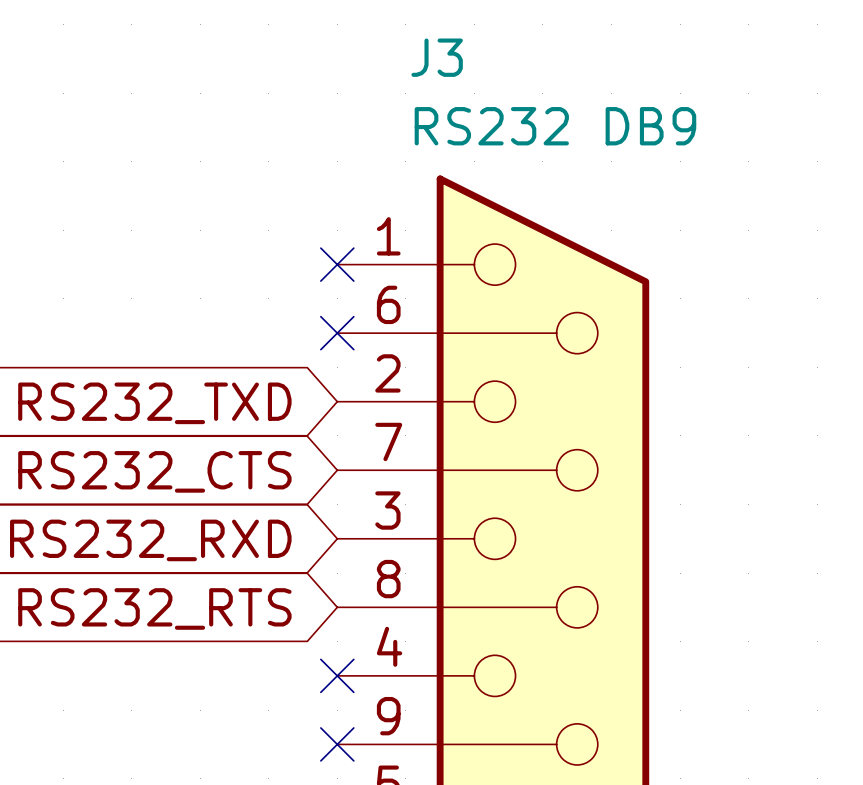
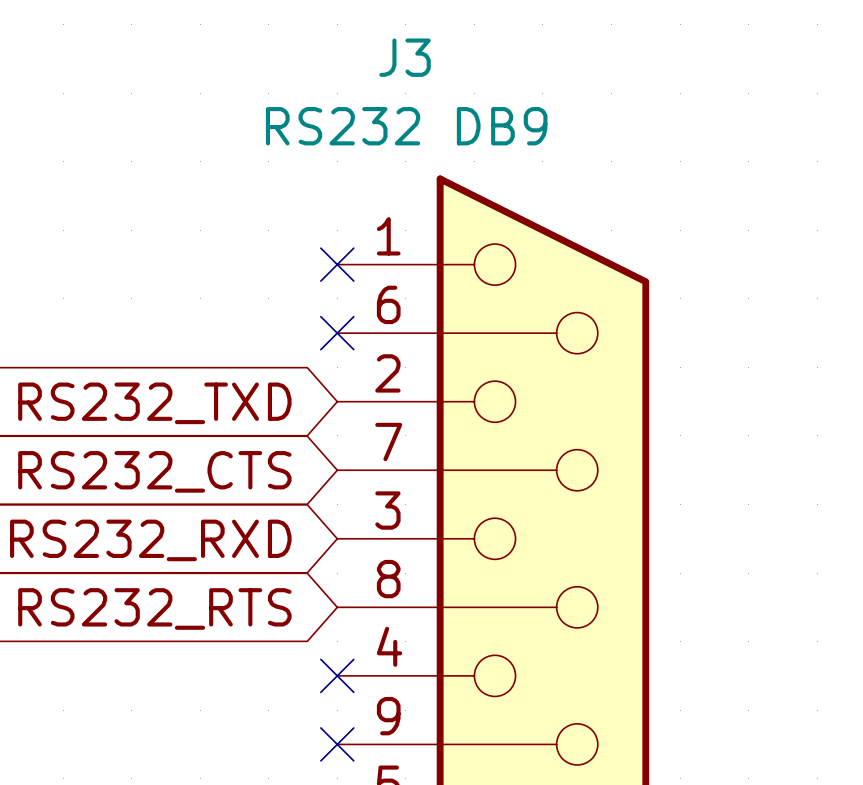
J3 name position: J3 (437, 57) -> J3 (405, 57)
J3 value position: RS232 DB9 (555, 126) -> RS232 DB9 (406, 126)

